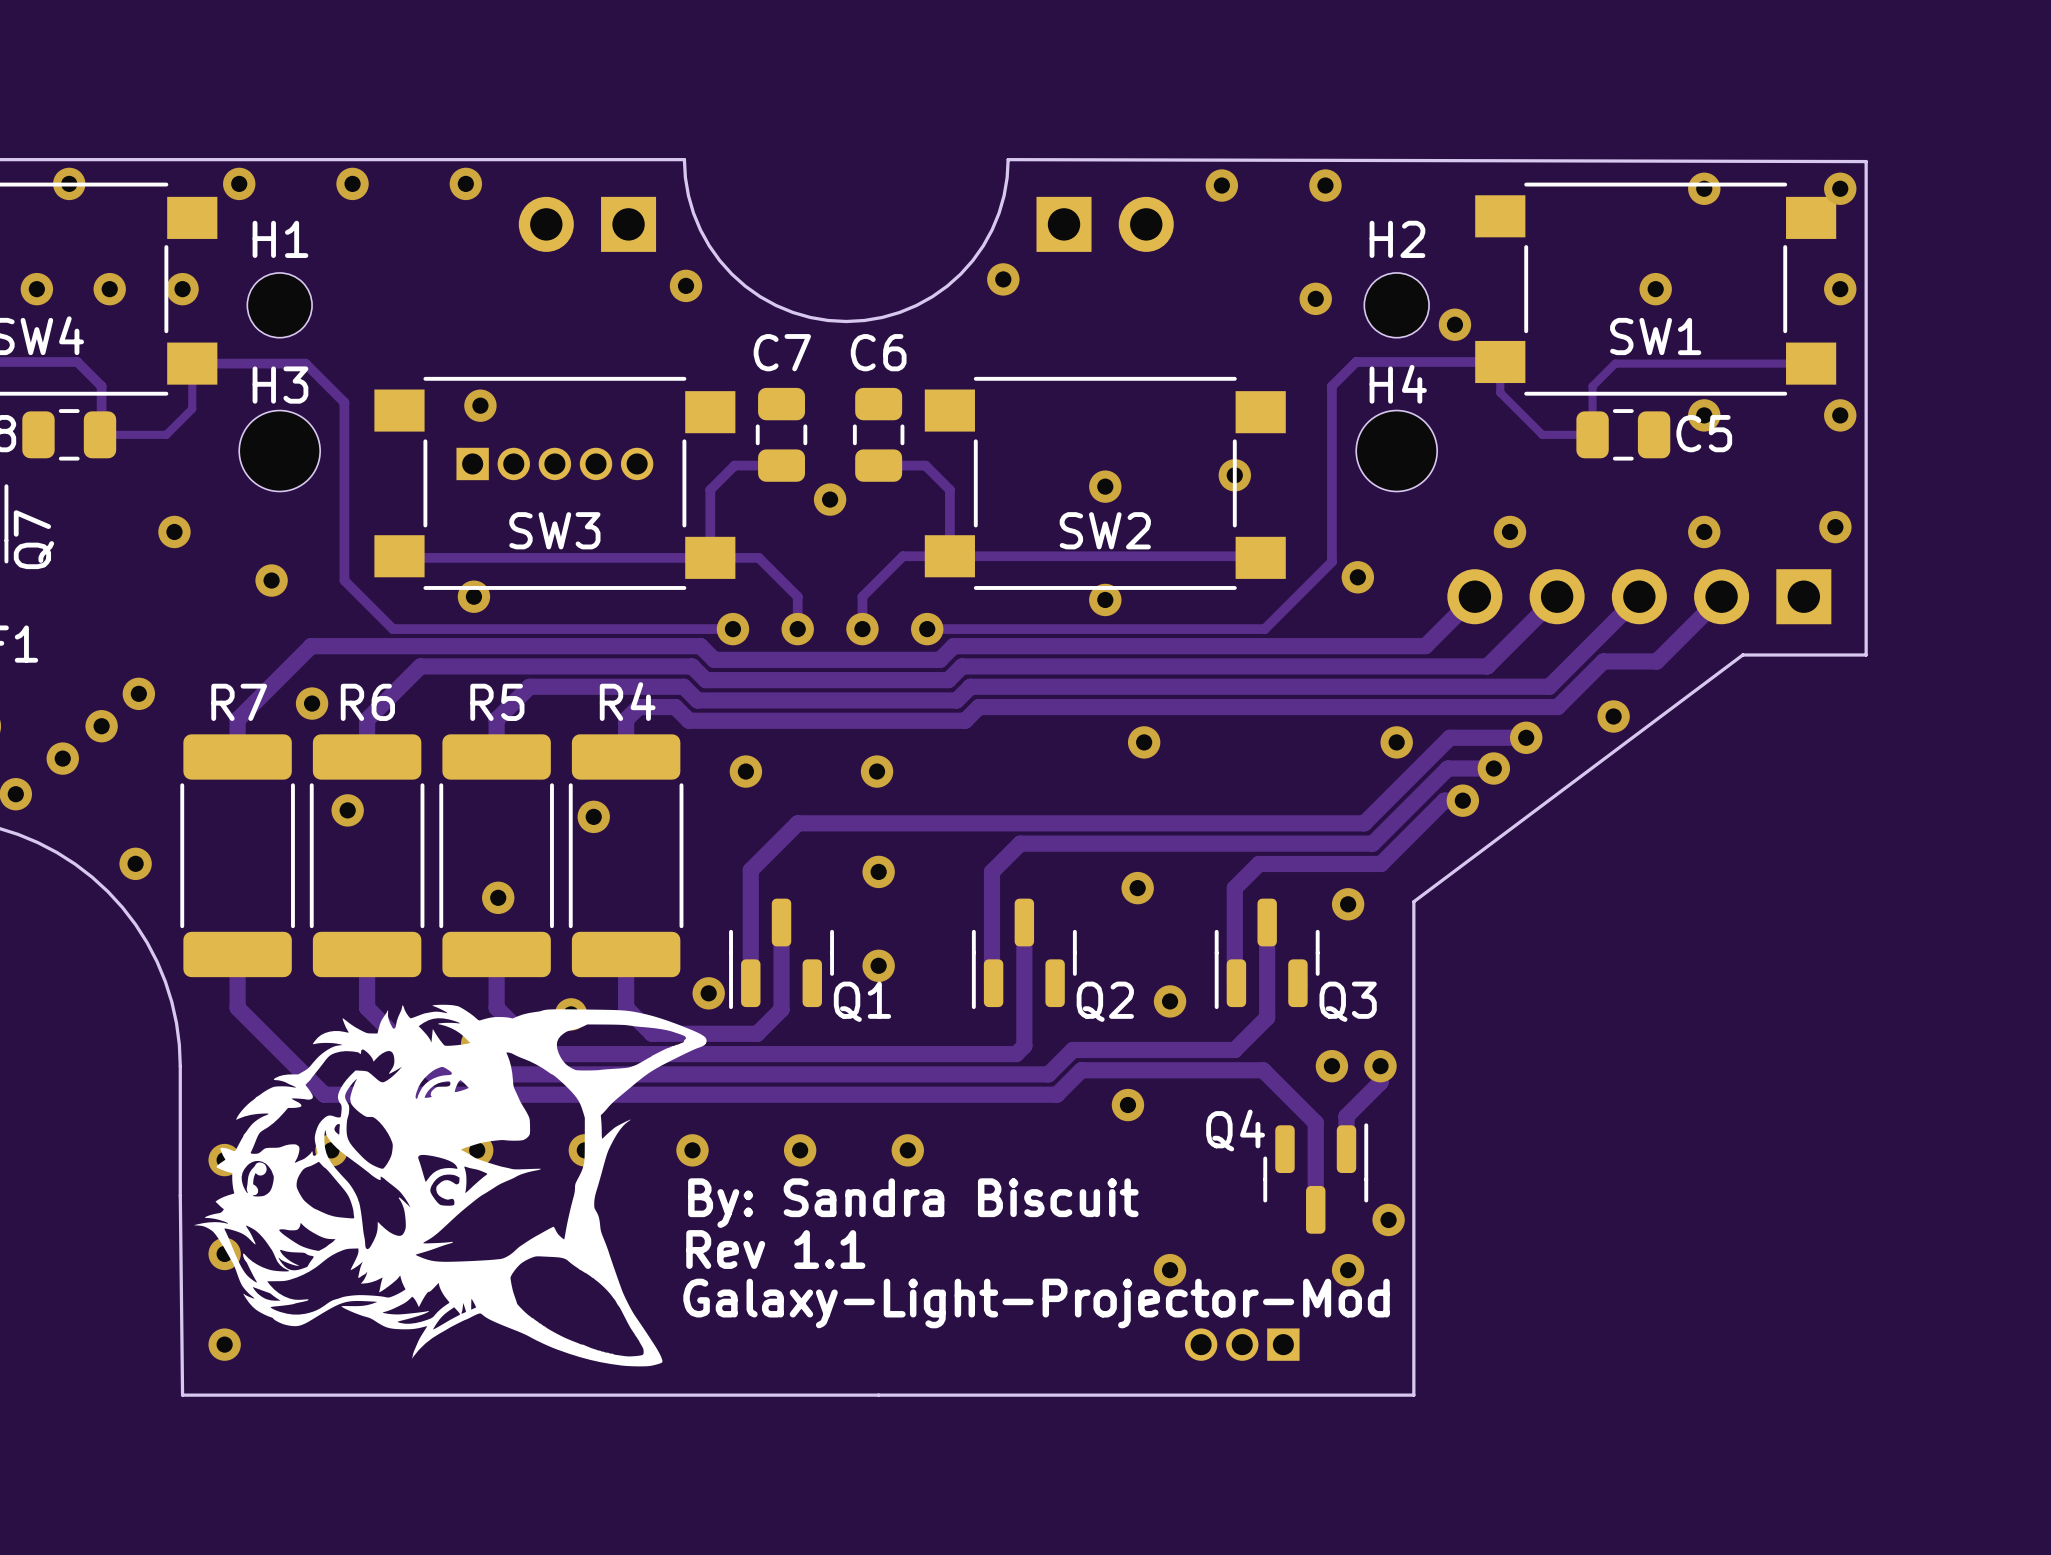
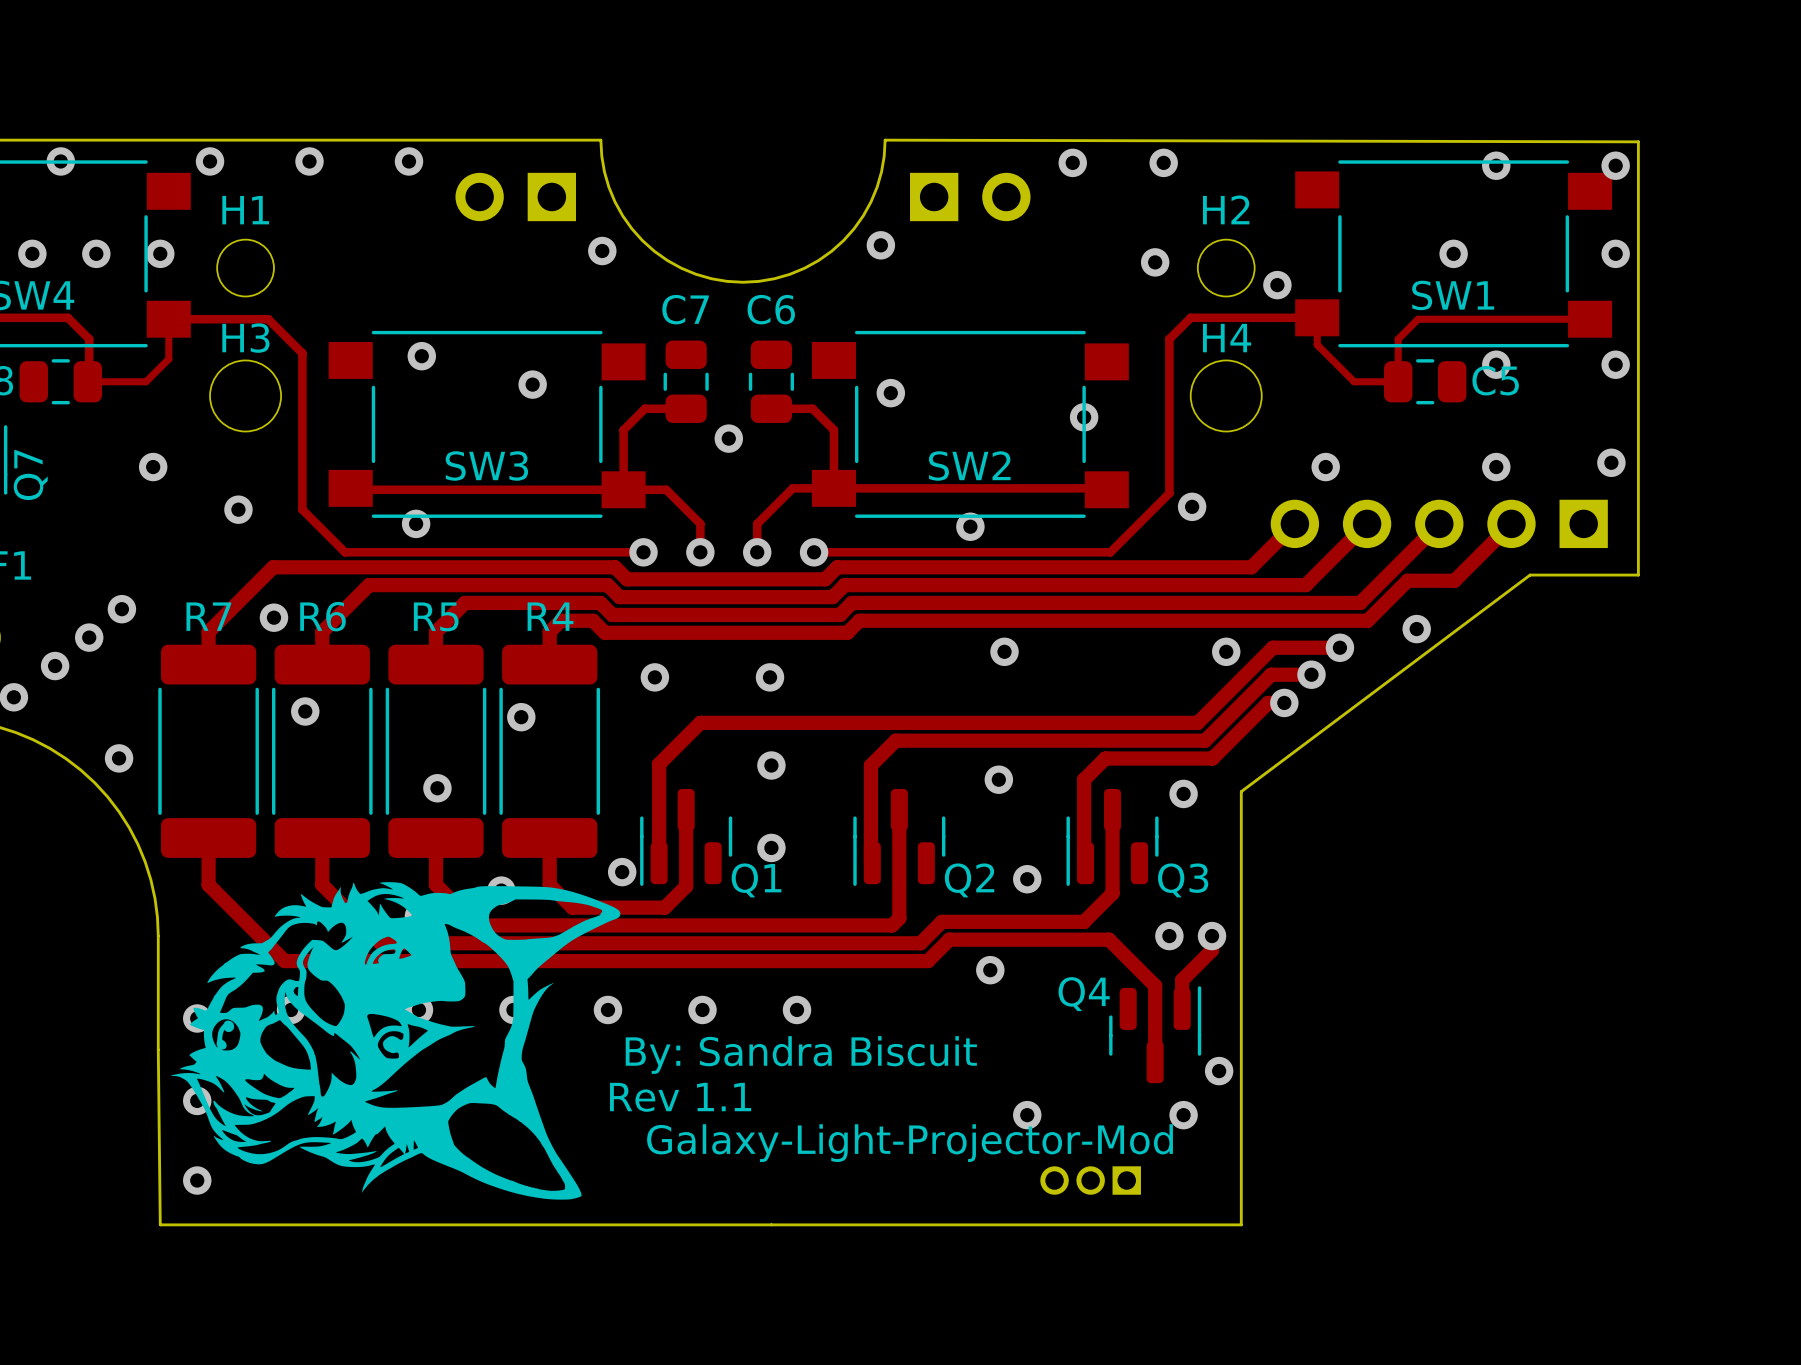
via: none -> (532, 384)
part: (554, 463) -> none
via position: (1105, 486) -> (890, 393)

